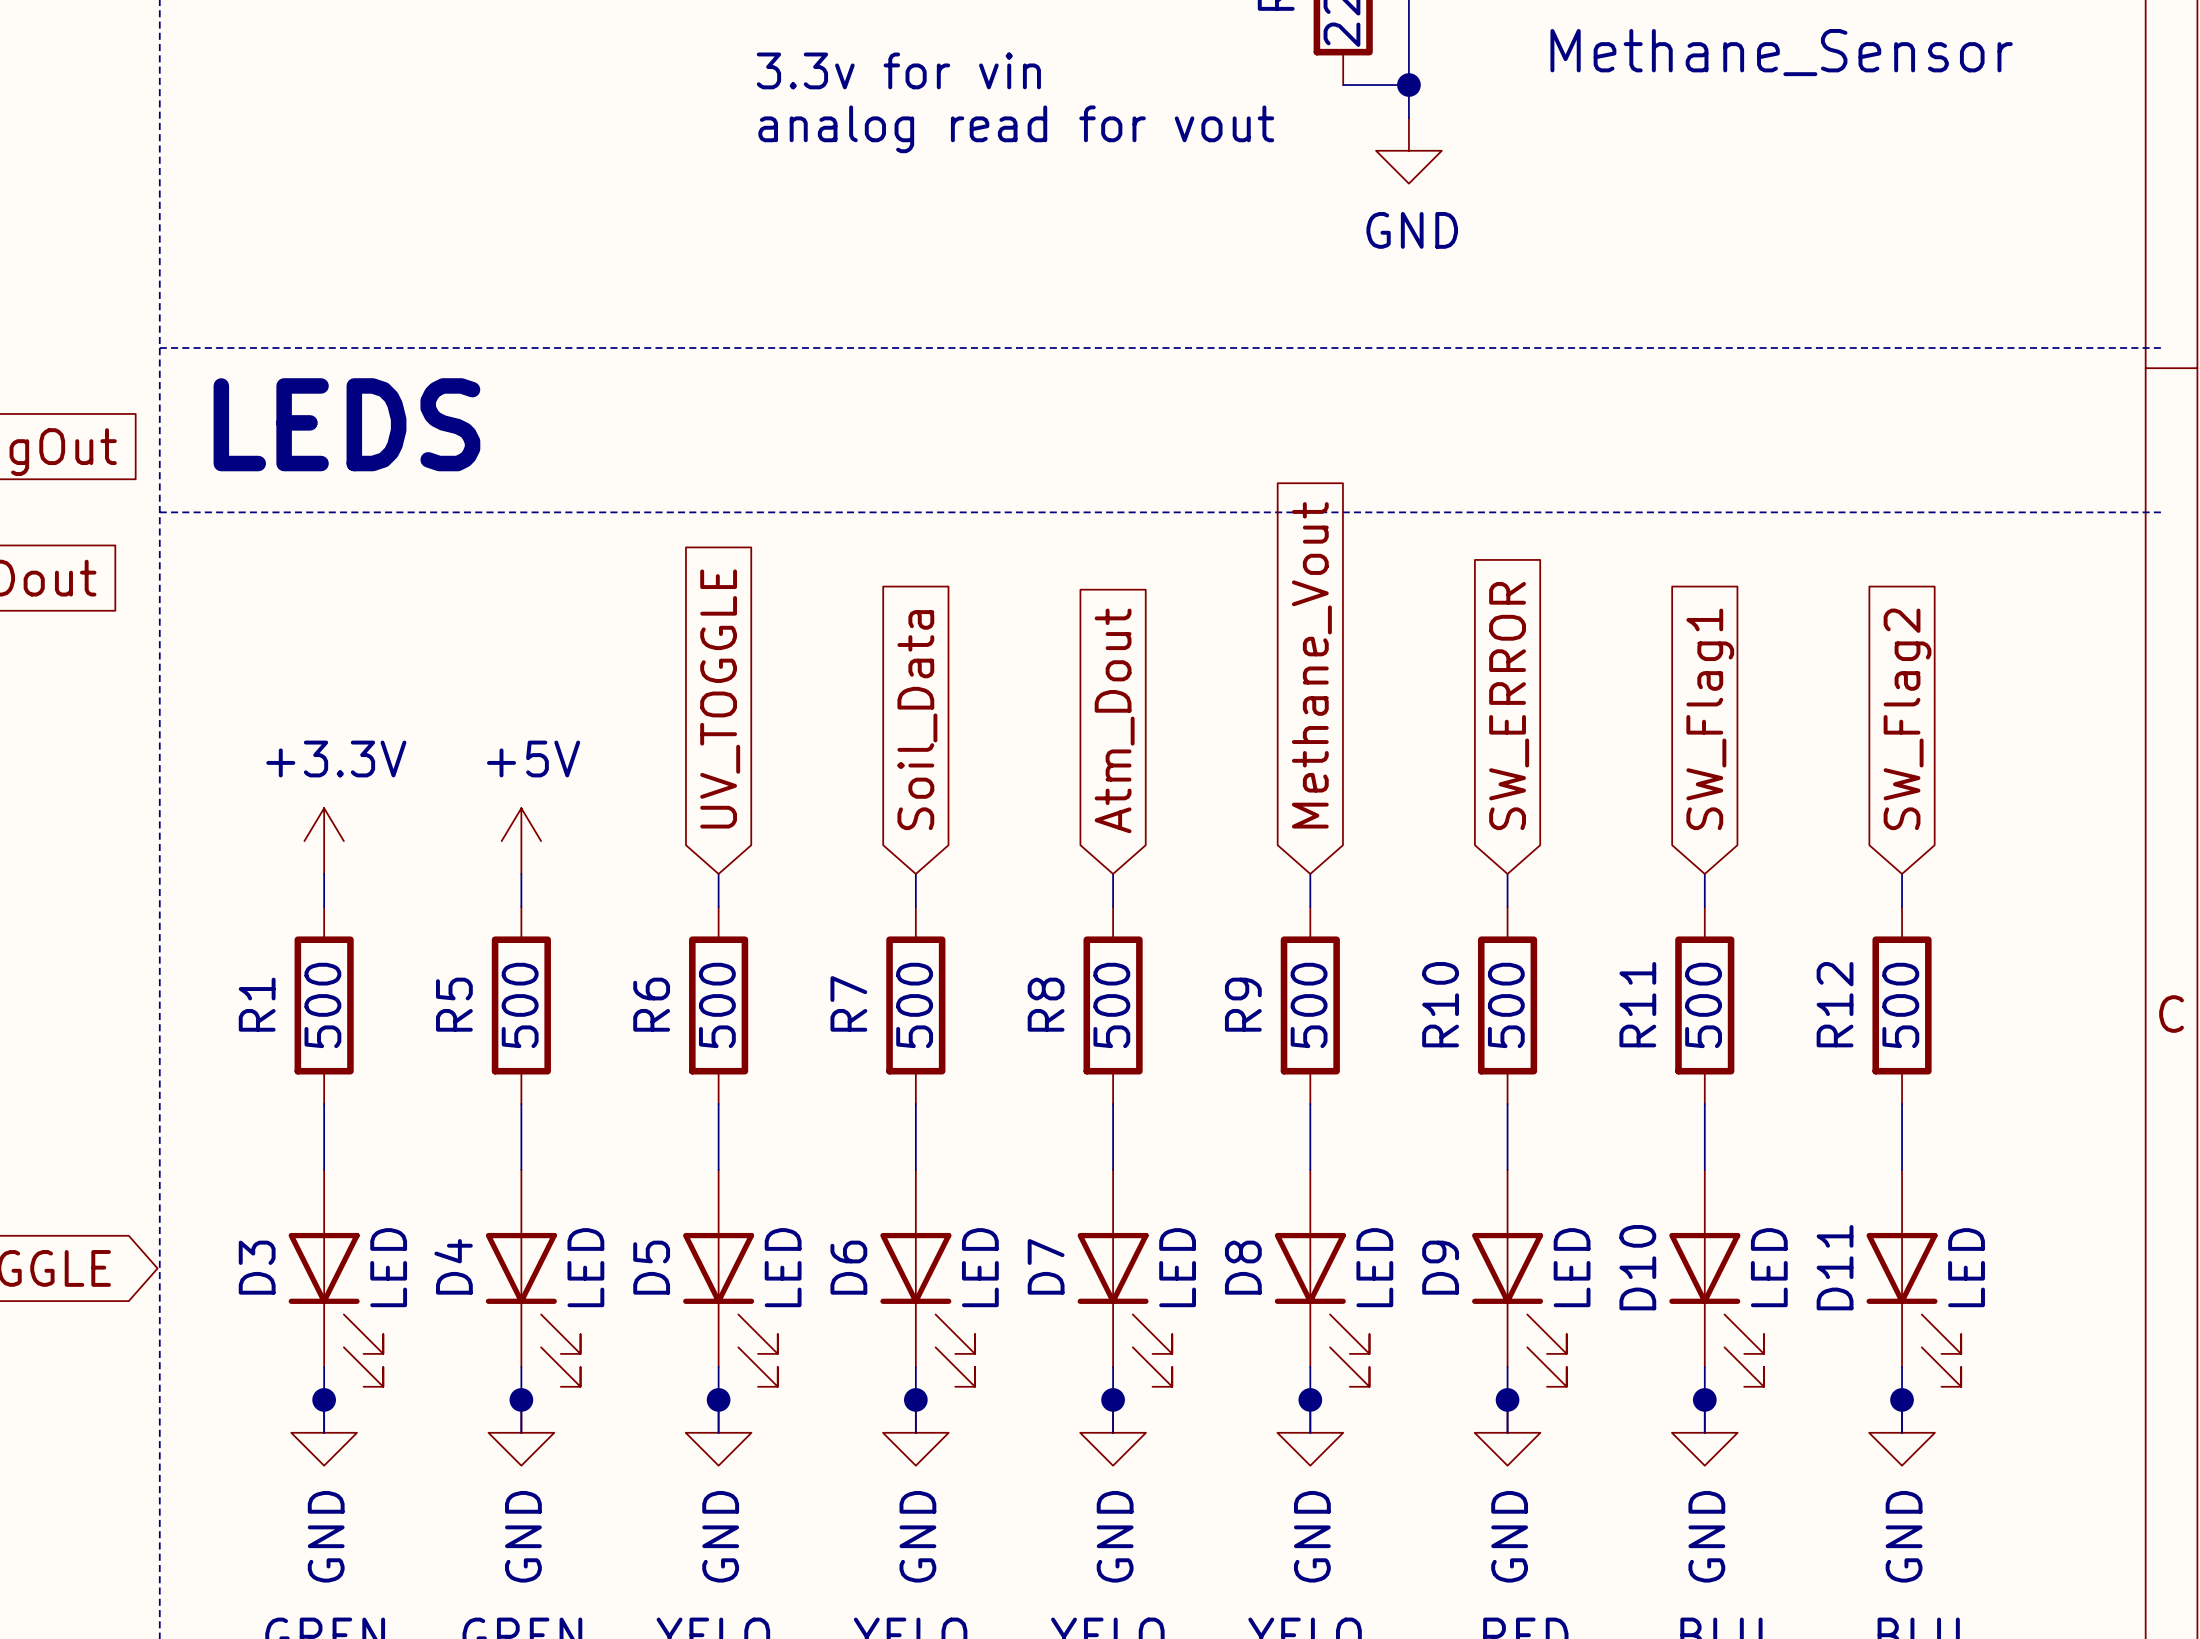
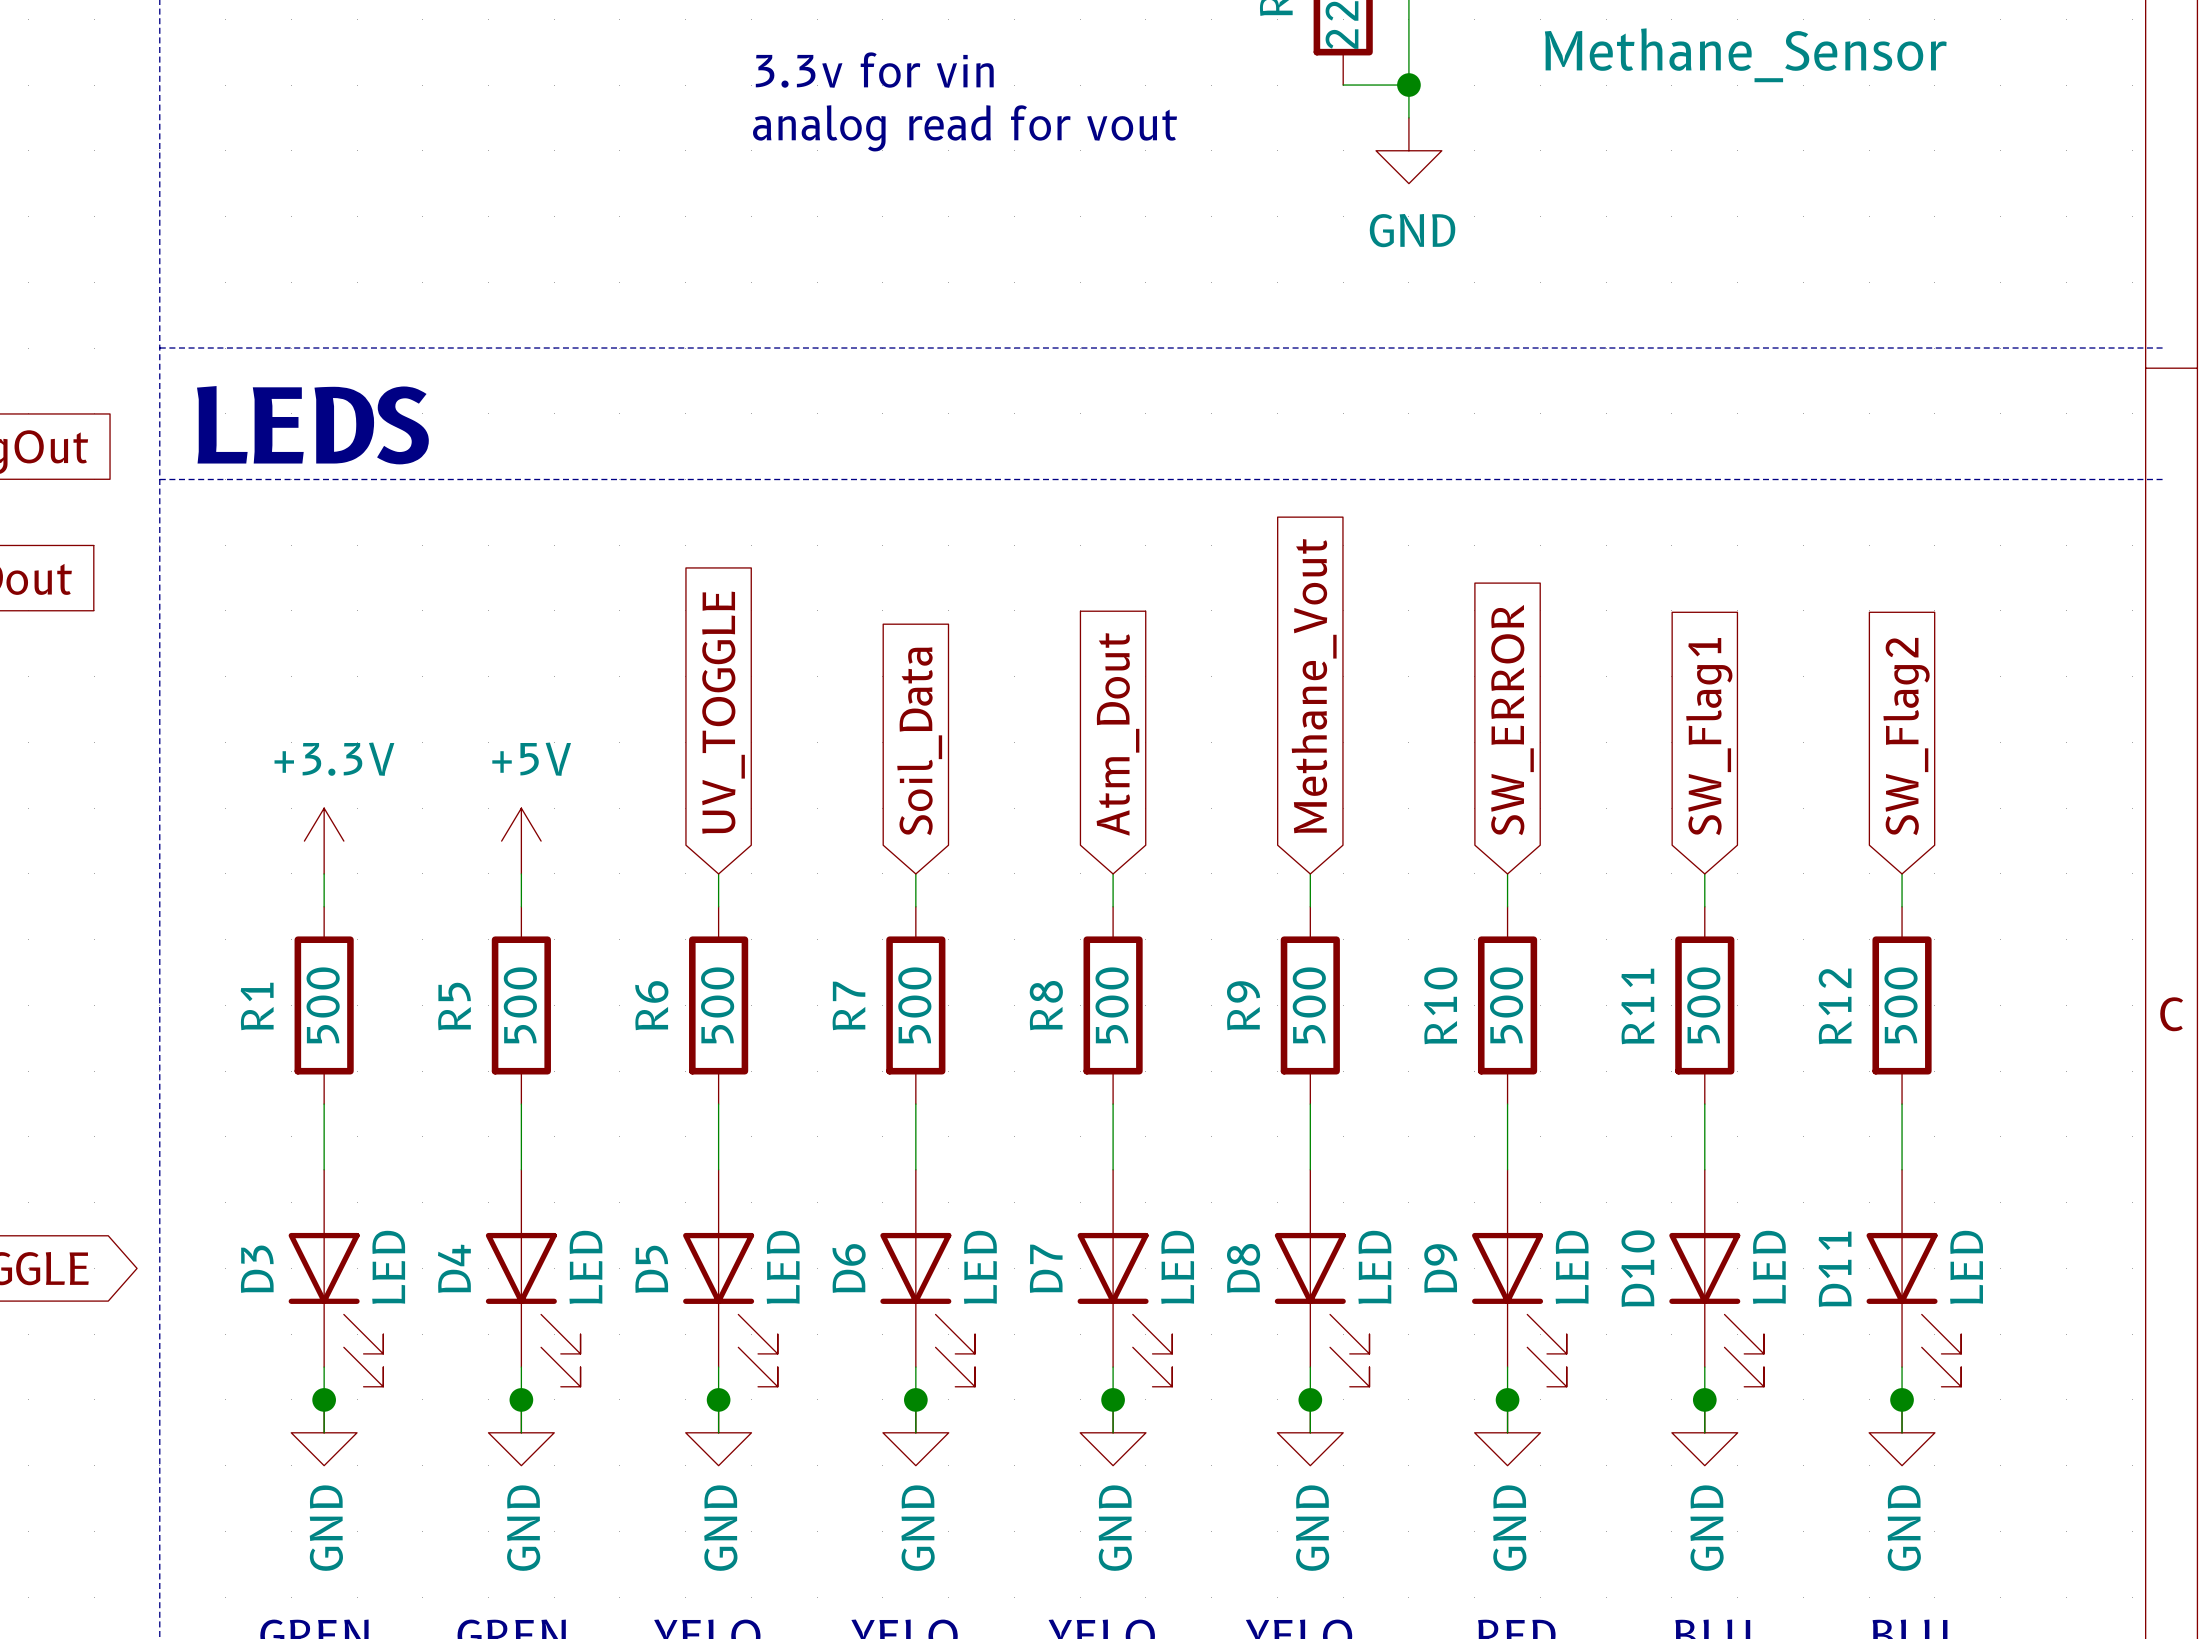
line: (159, 512) (2165, 512) -> (159, 479) (2165, 479)

